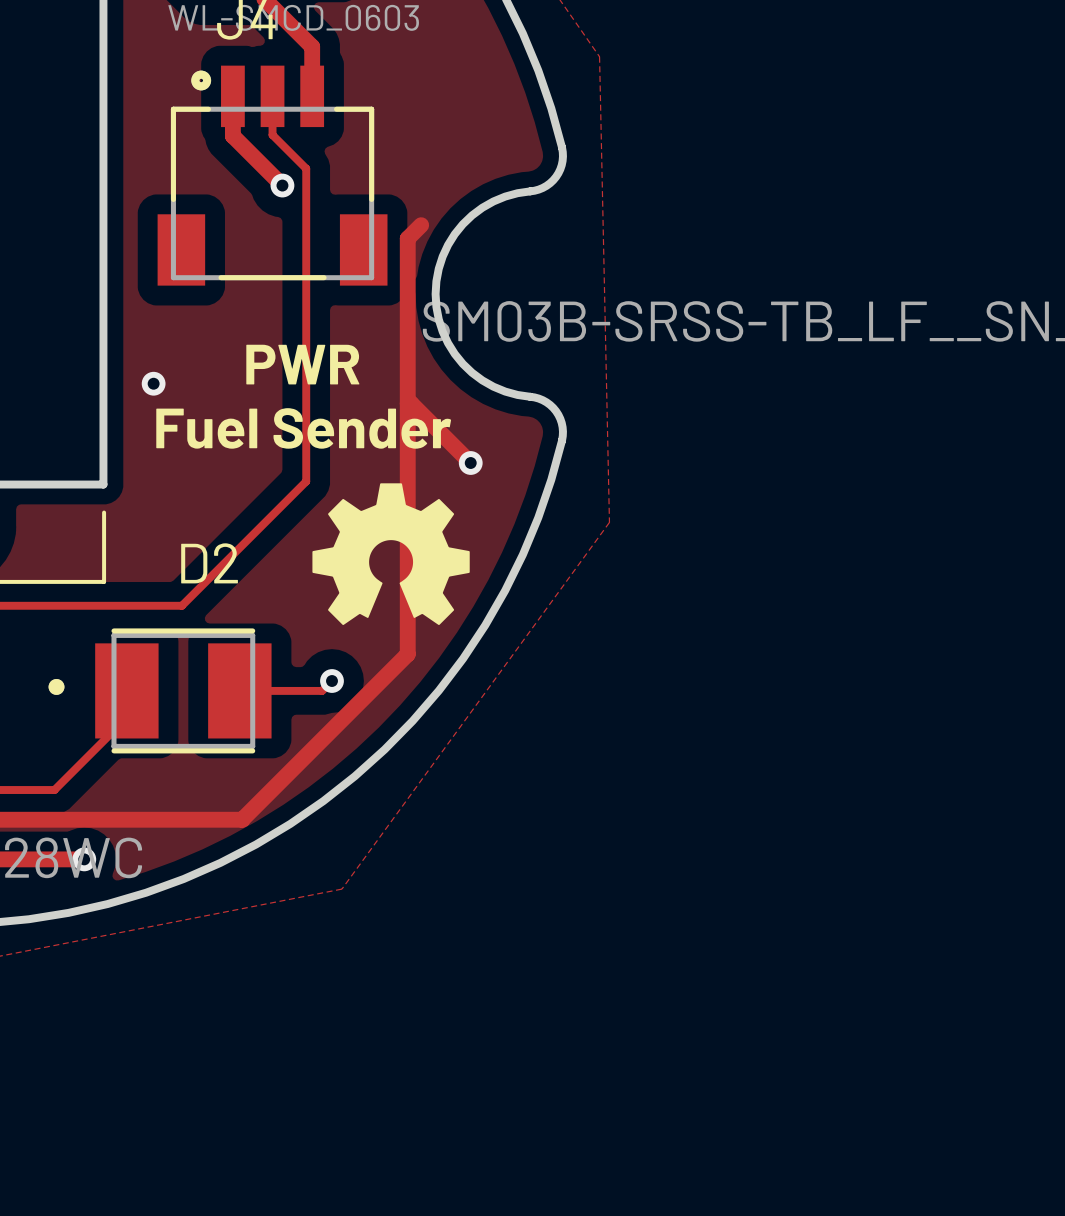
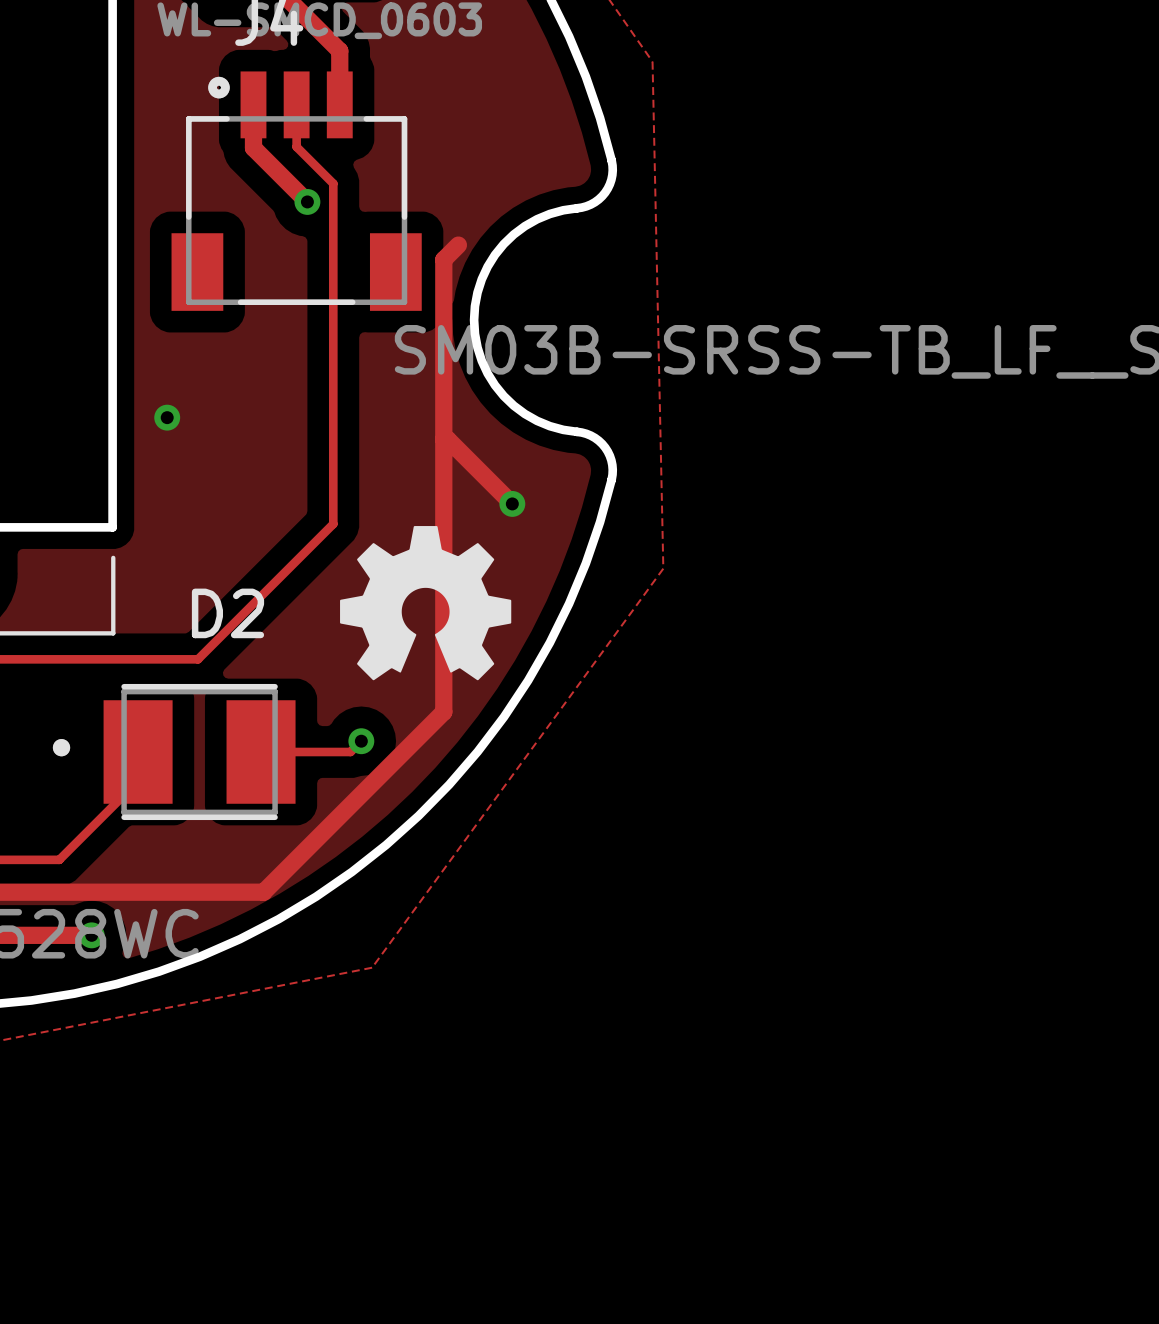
text: PWR (302, 364) -> none
text: Fuel Sender (303, 428) -> none

